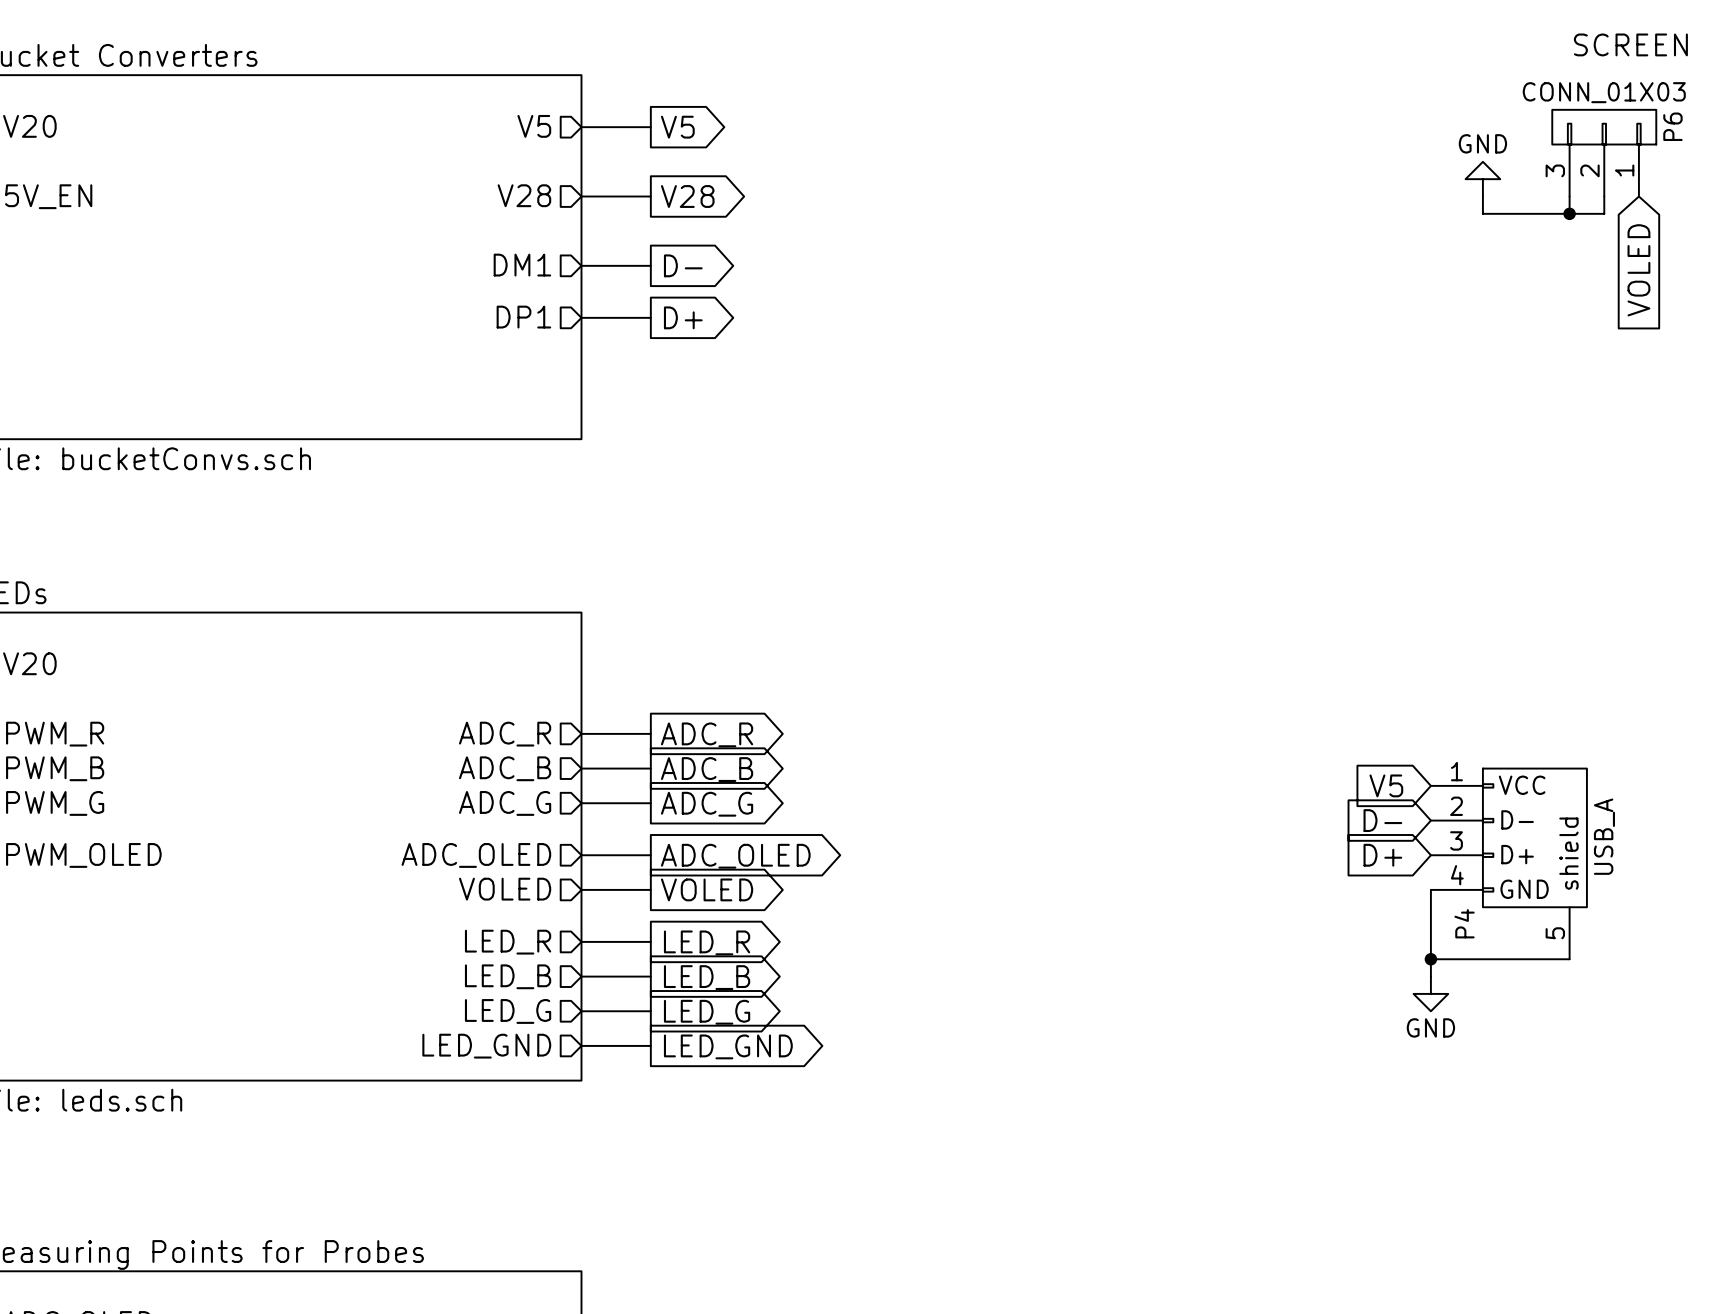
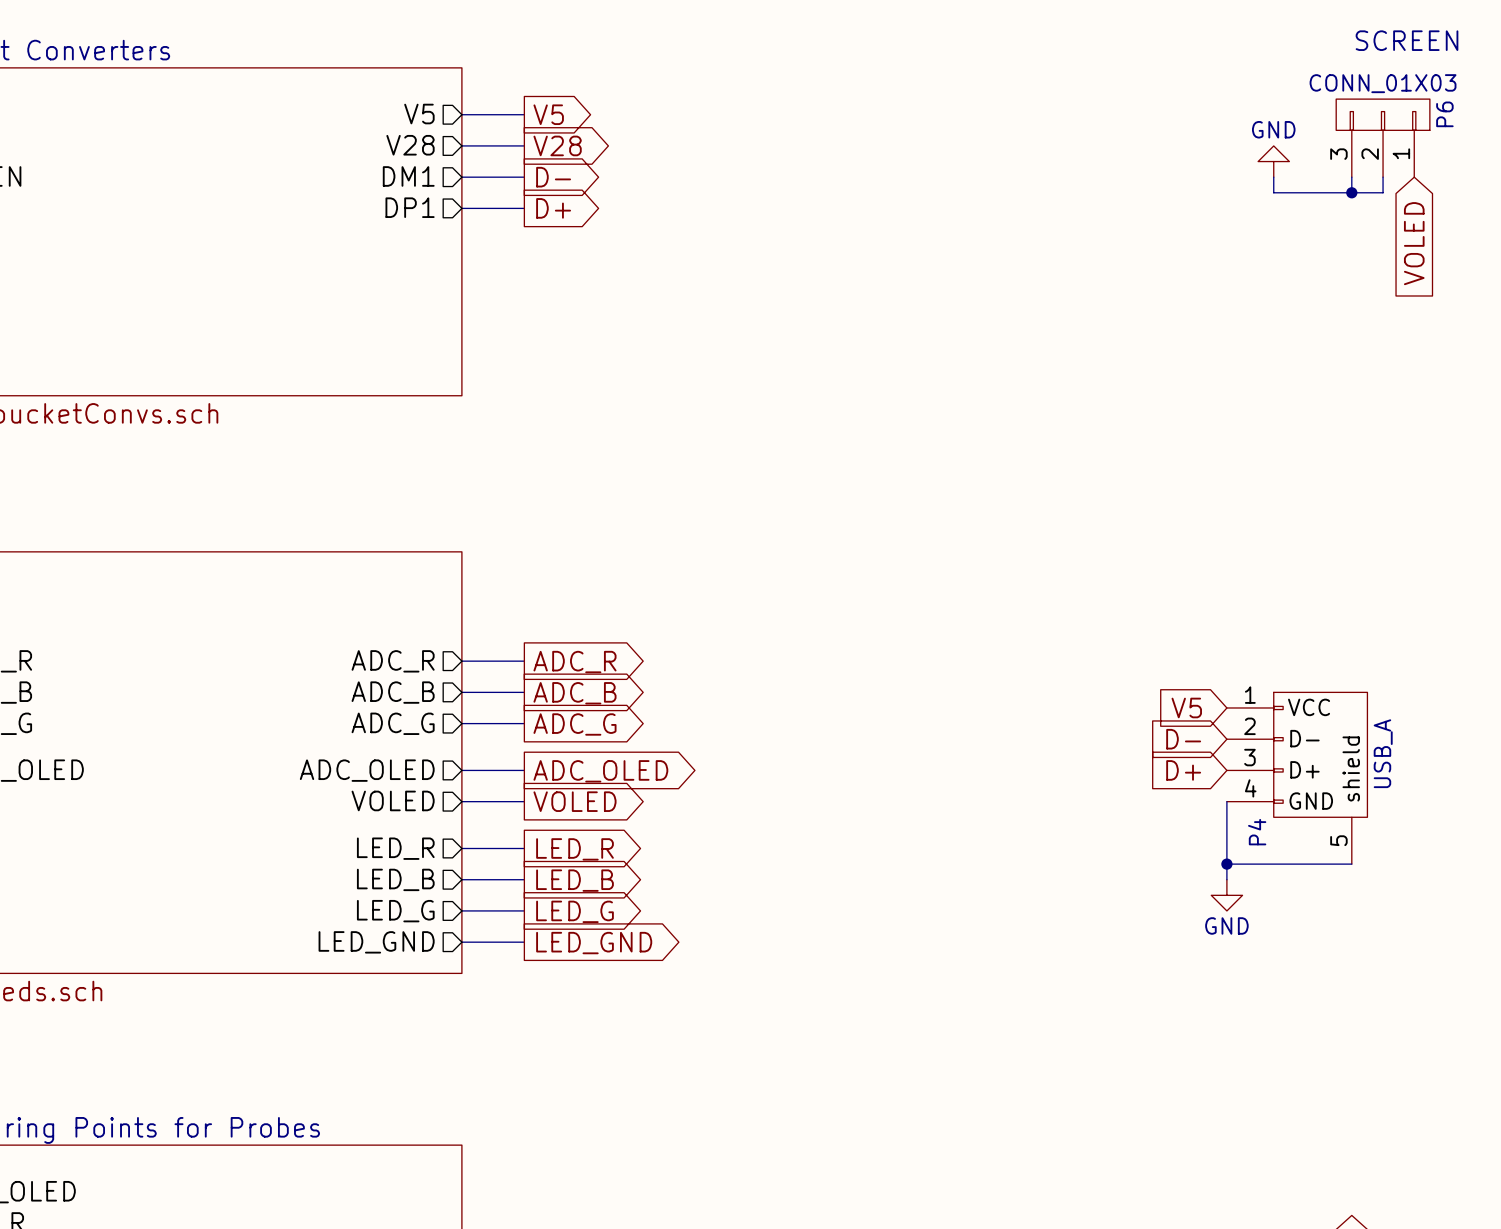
sheet pin: none -> V28 (410, 145)
global label: none -> V28 (557, 145)
sheet pin: V28 (524, 195) -> DM1 (408, 176)
global label: V28 (687, 196) -> D- (553, 177)
sheet pin: DM1 (522, 265) -> none
wire: (581, 265) (650, 265) -> (461, 208) (524, 208)
global label: D- (683, 265) -> none
sheet pin position: DP1 (523, 317) -> DP1 (410, 207)
wire: (581, 317) (650, 317) -> (461, 145) (524, 145)
global label position: D+ (683, 317) -> D+ (553, 208)

